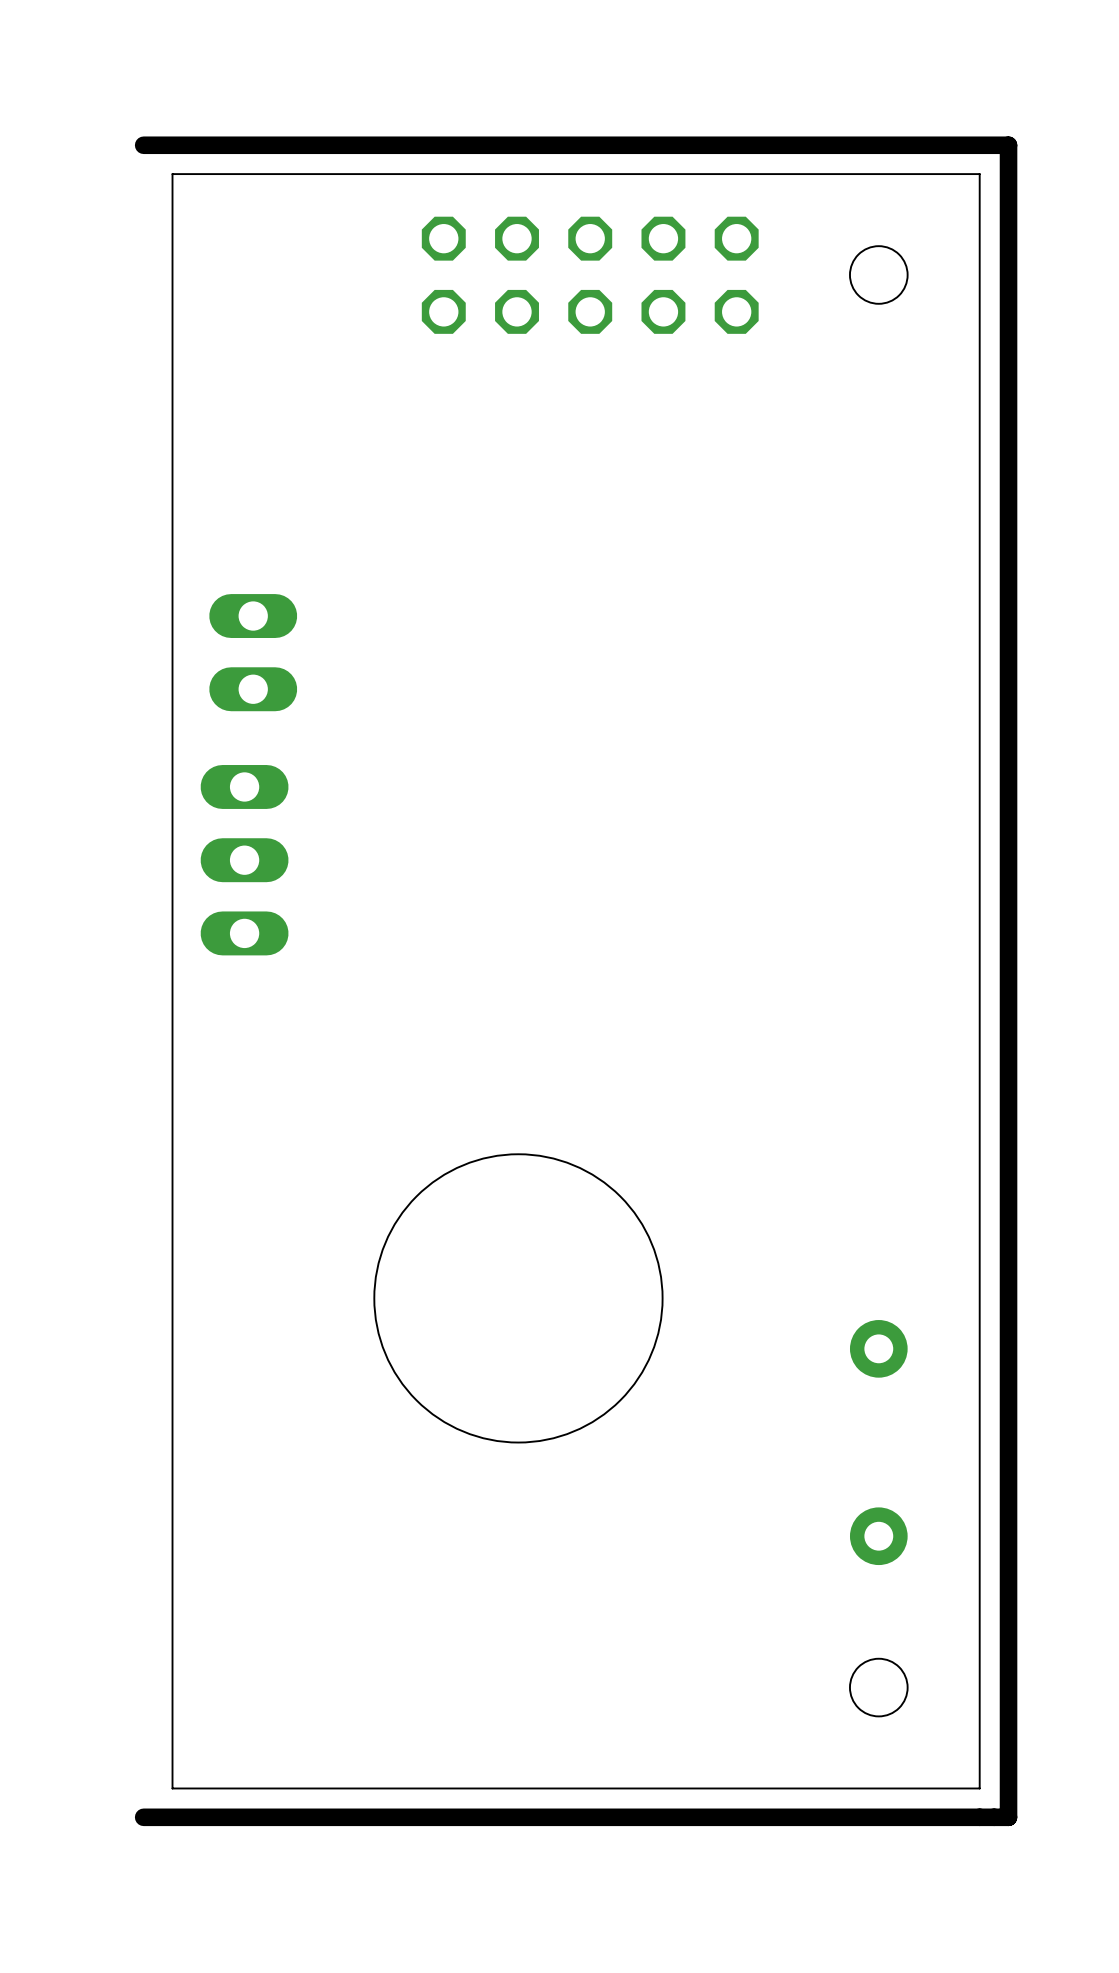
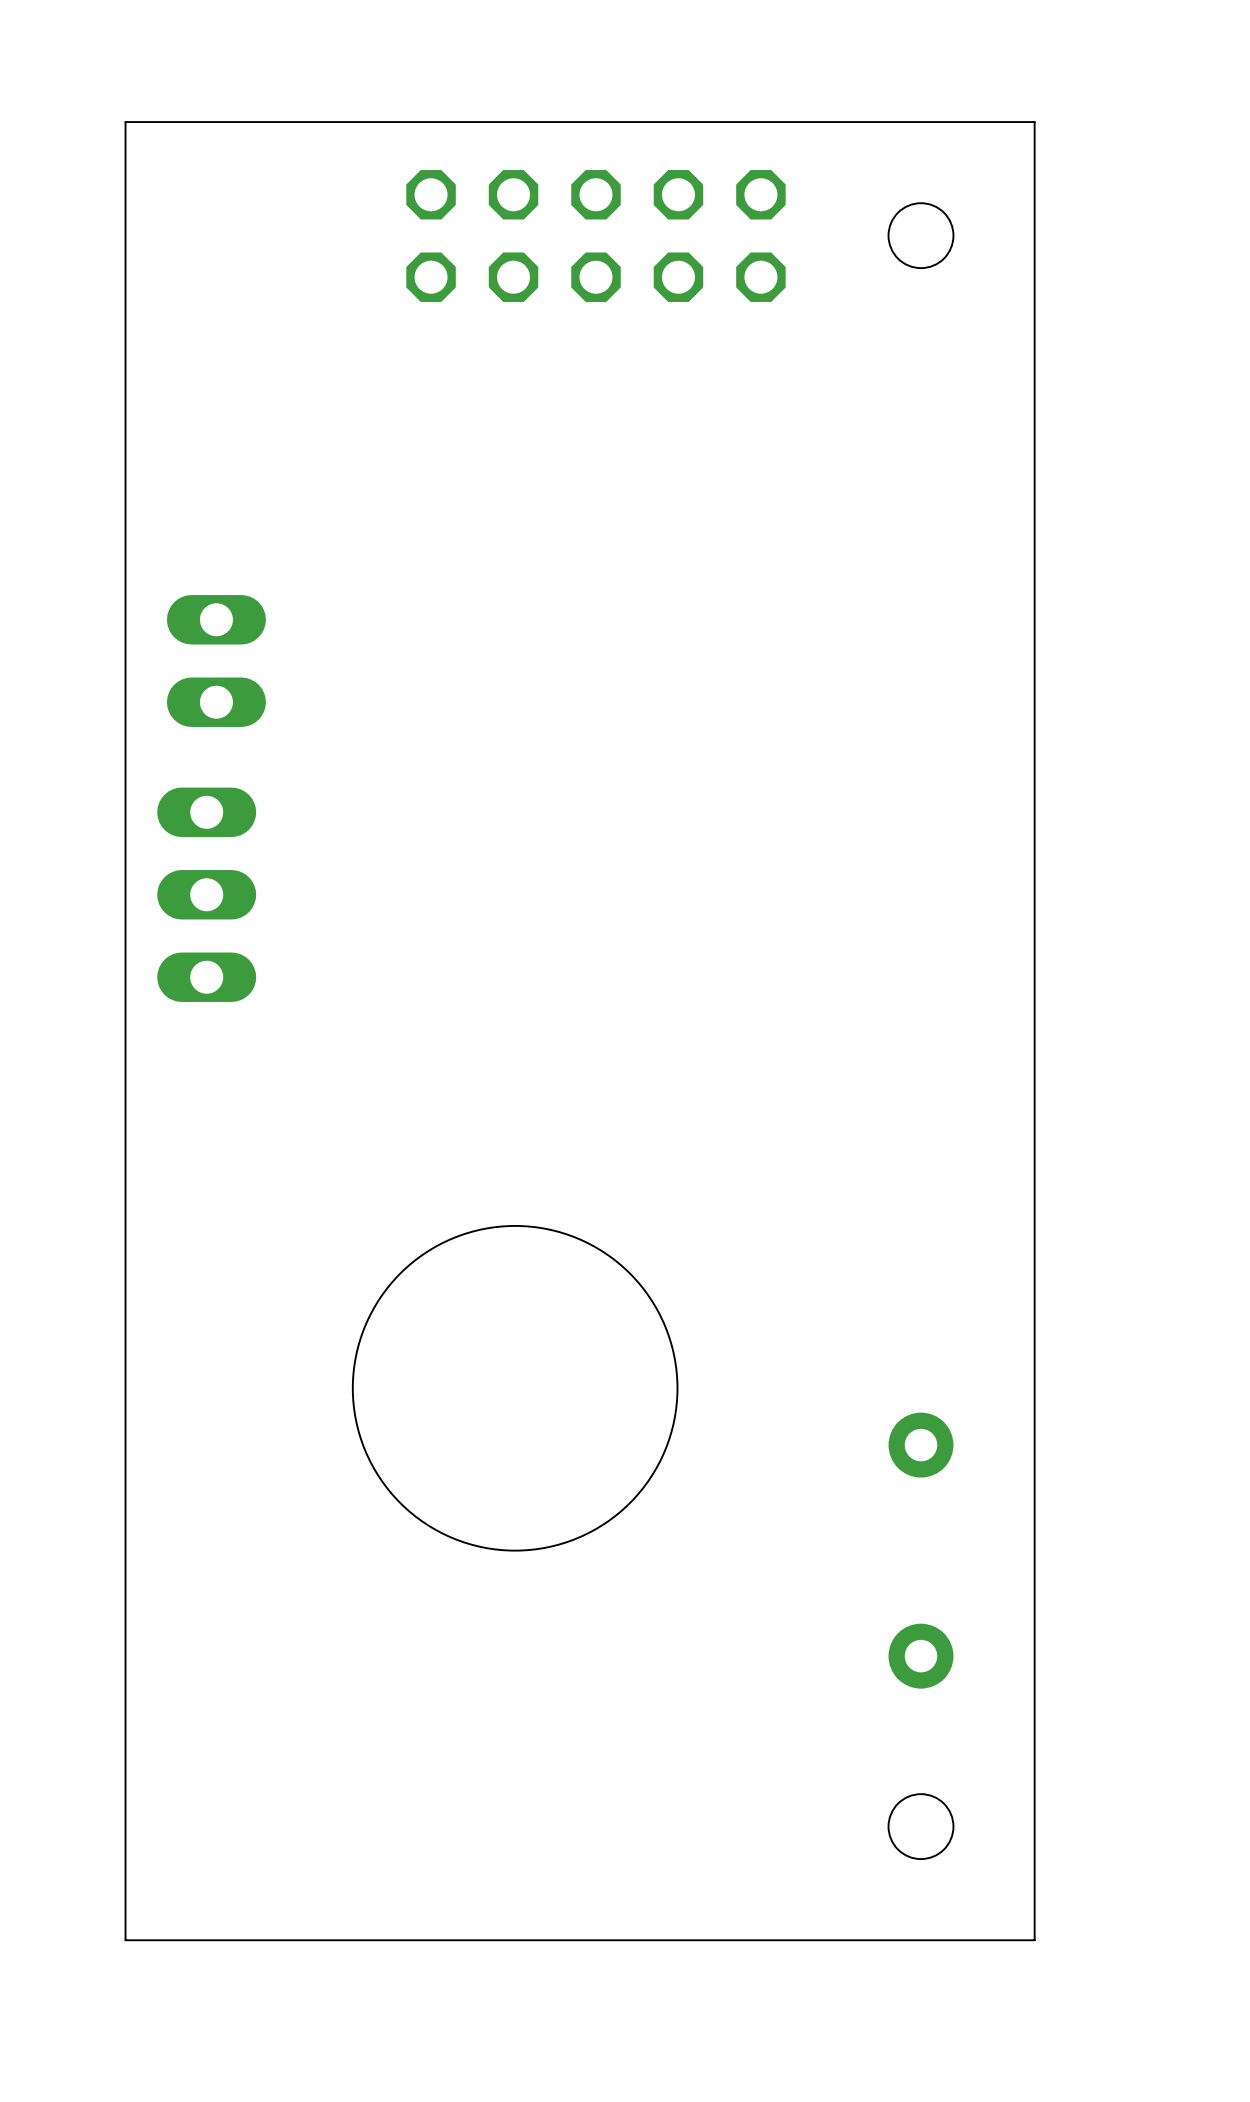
board edge: (143, 145) (1008, 145) (1008, 1817) (143, 1817) -> none

